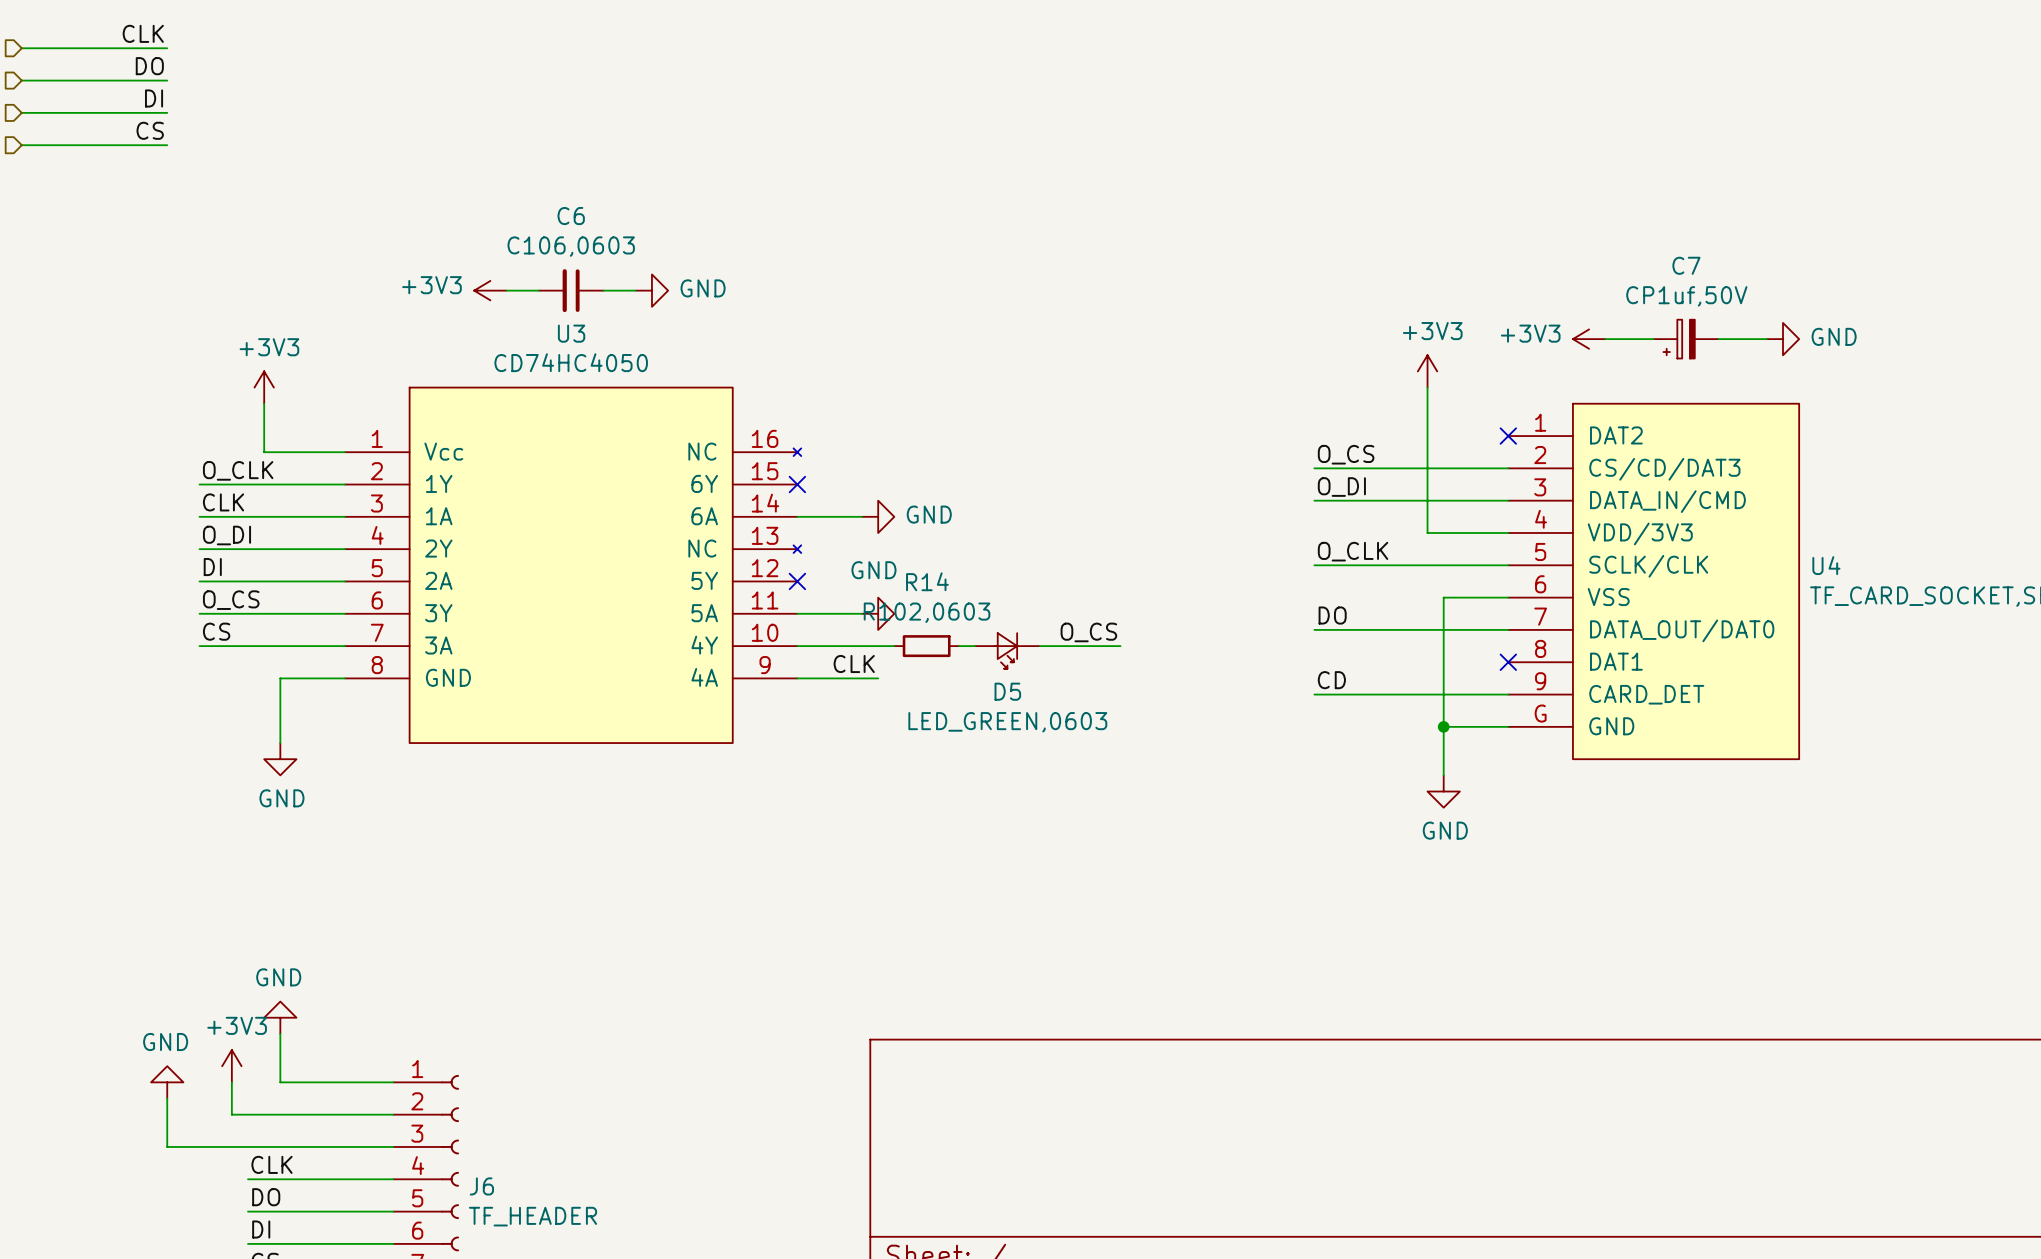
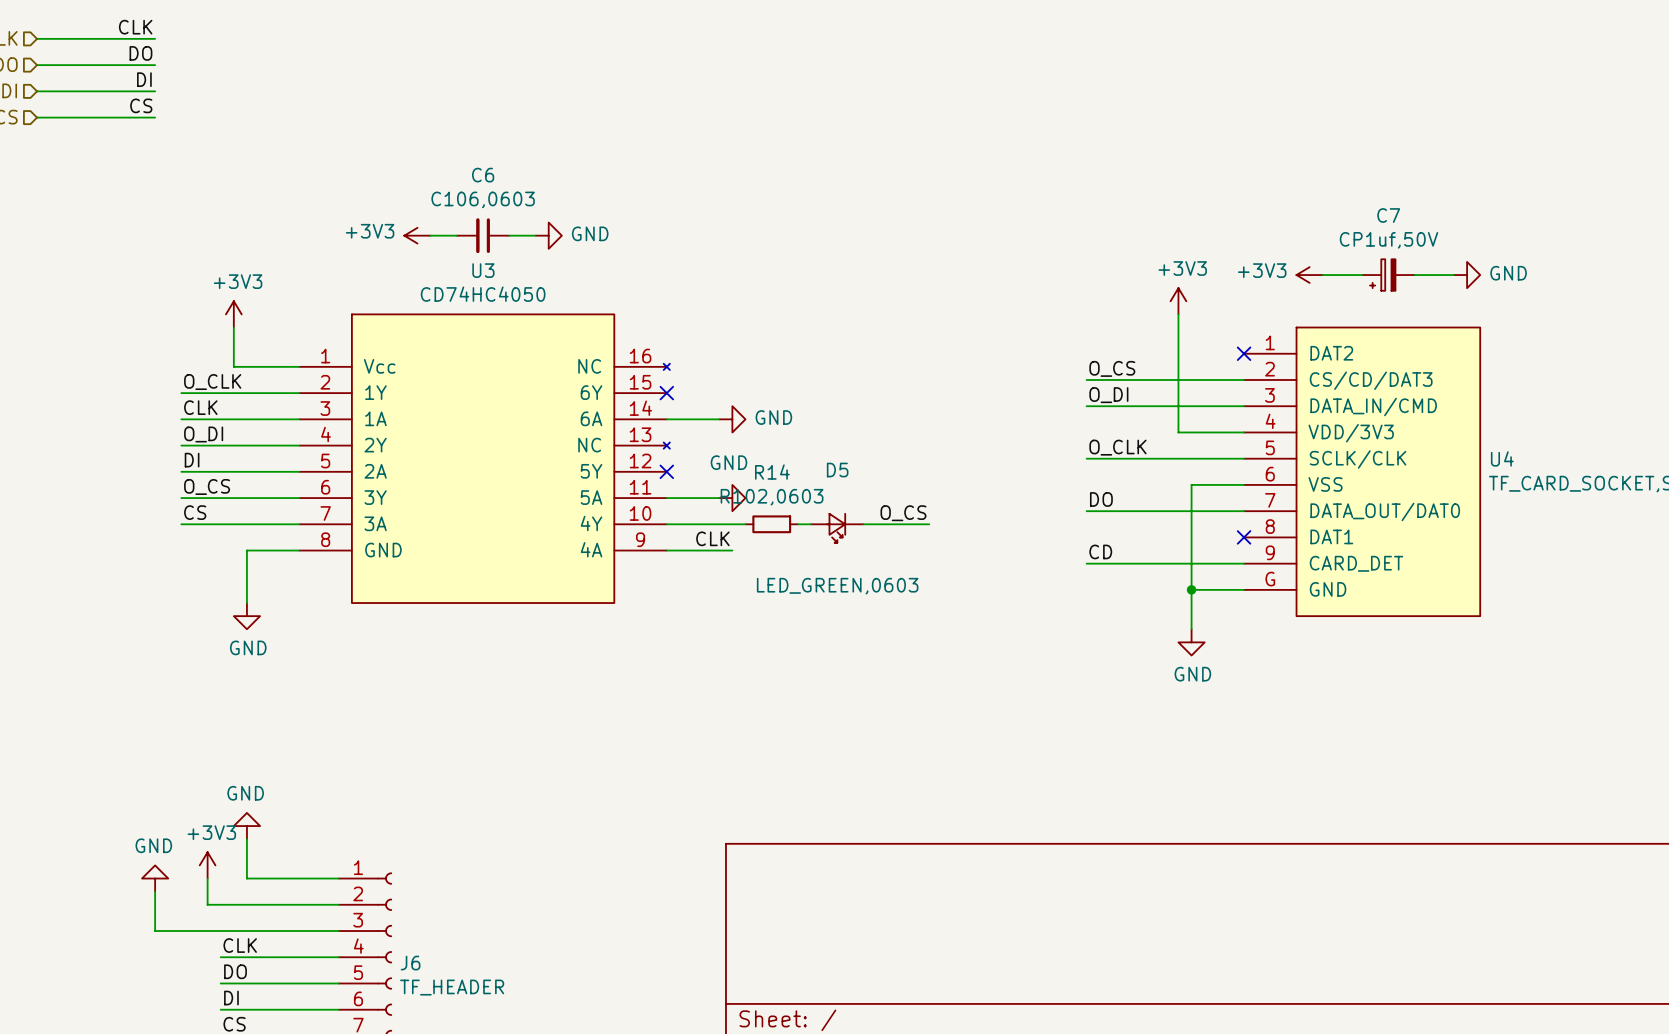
D5 name position: D5 (1007, 691) -> D5 (837, 470)

